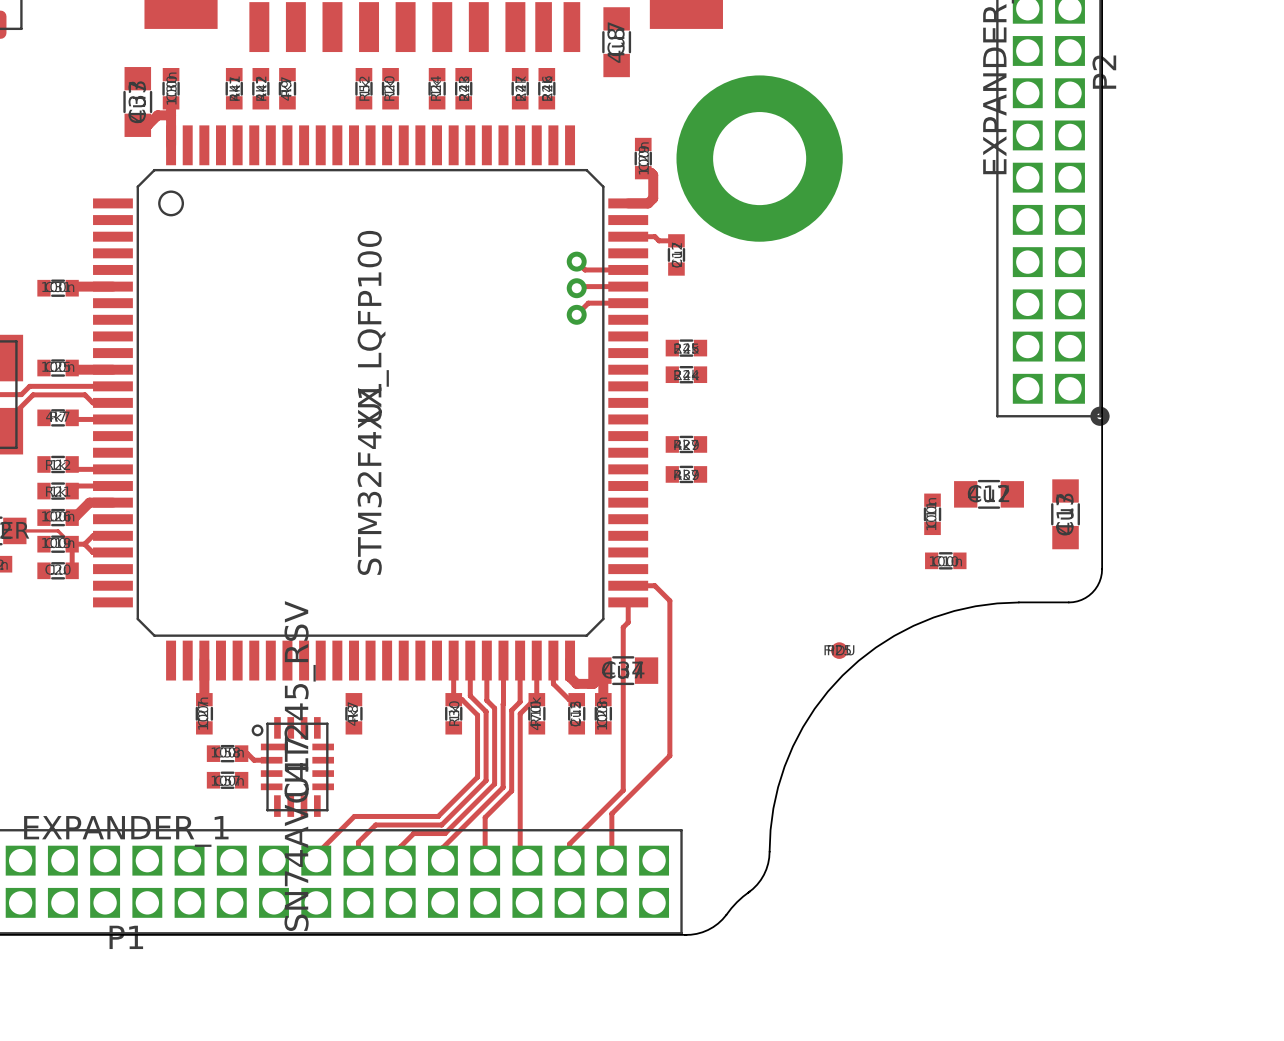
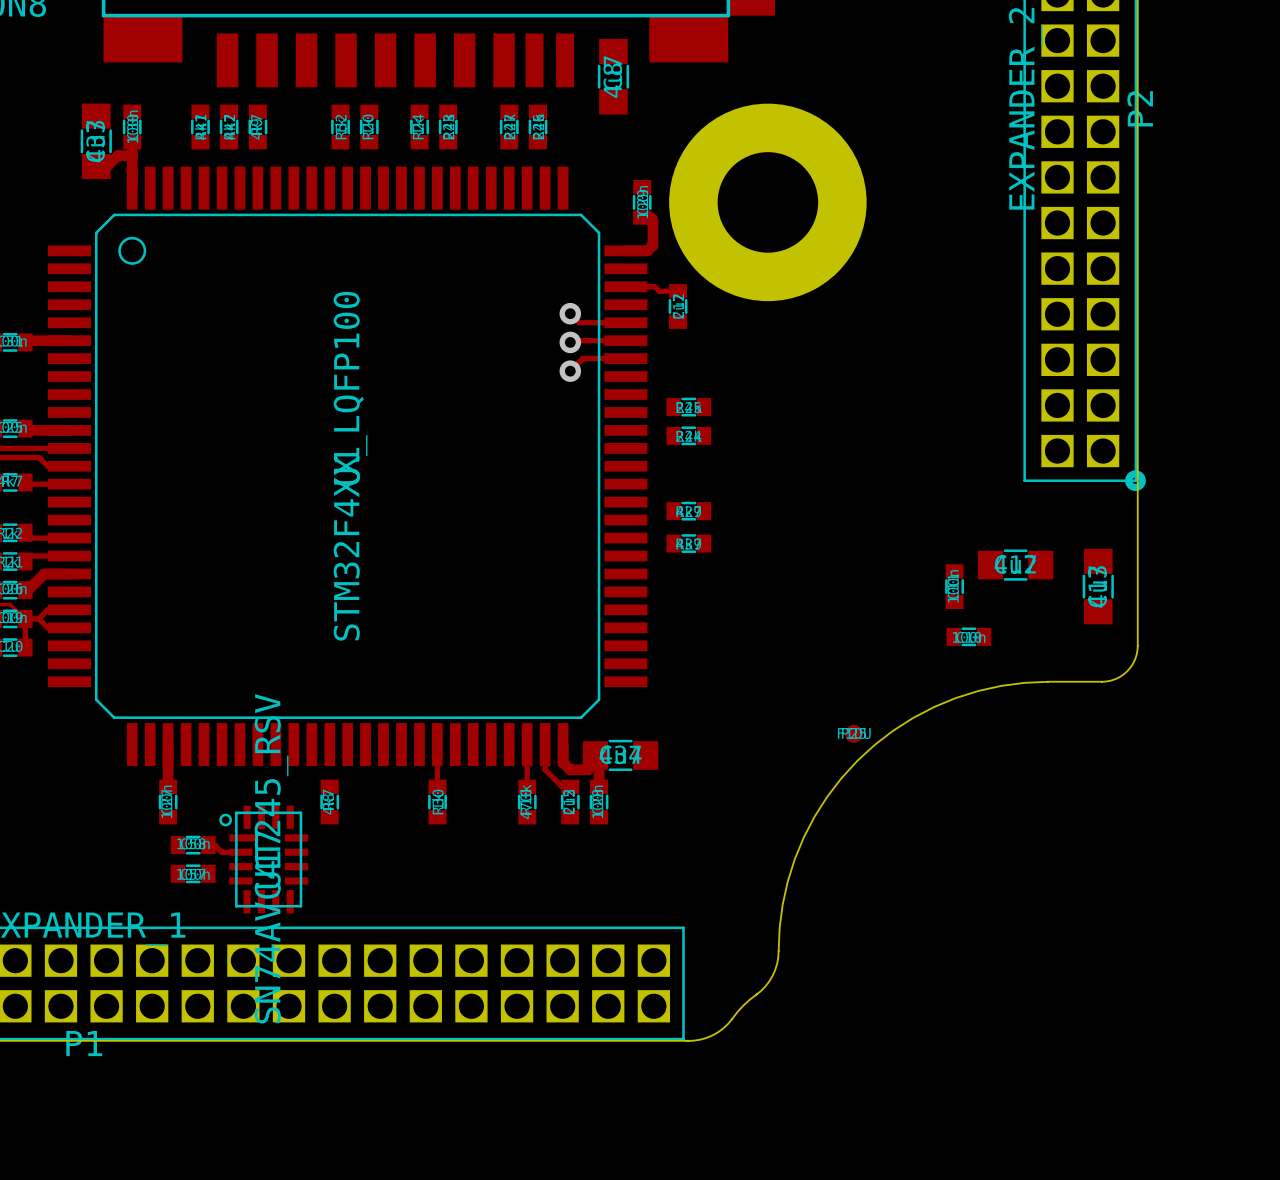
part footprint: [676, 75, 843, 242] -> [669, 103, 867, 302]
track: (628, 585) (654, 585) (669, 600) (669, 755) (611, 813) (611, 860) -> none
track: (628, 602) (628, 622) (623, 627) (623, 790) (569, 844) (569, 860) -> none
track: (470, 660) (470, 695) (486, 711) (486, 780) (441, 825) (375, 825) (358, 842) (358, 860) -> none
track: (486, 660) (486, 700) (494, 708) (494, 783) (445, 833) (413, 833) (400, 846) (400, 860) -> none
track: (503, 660) (503, 703) -> none
track: (520, 660) (520, 701) (511, 710) (511, 790) (485, 817) (485, 860) -> none
track: (453, 699) (462, 699) (477, 715) (477, 777) (438, 816) (354, 816) (316, 854) (316, 860) -> none
track: (536, 699) (534, 699) (520, 713) (520, 853) (527, 860) -> none
track: (503, 704) (503, 787) (442, 847) (442, 860) -> none

